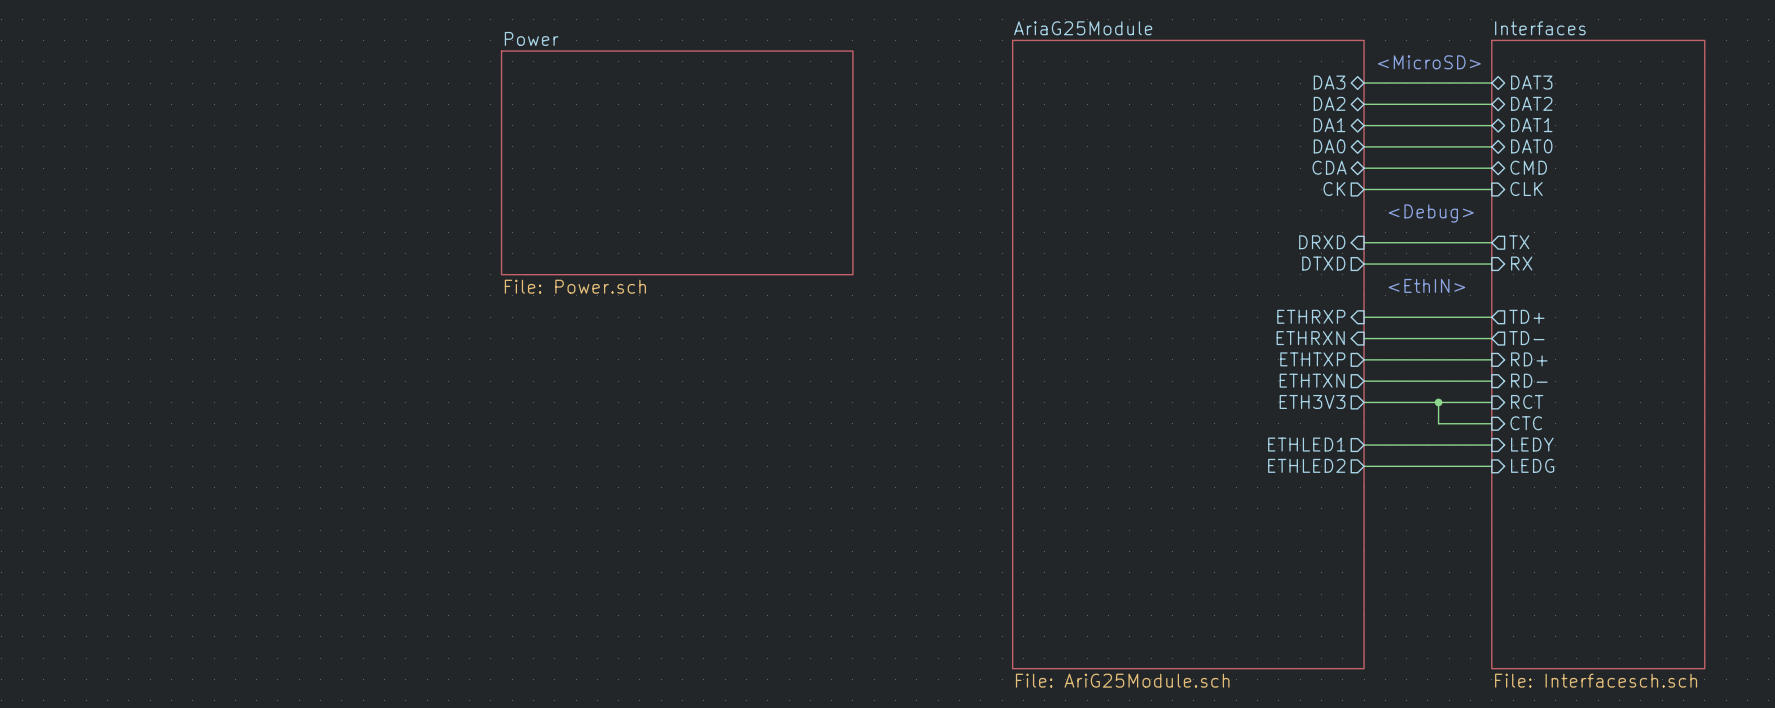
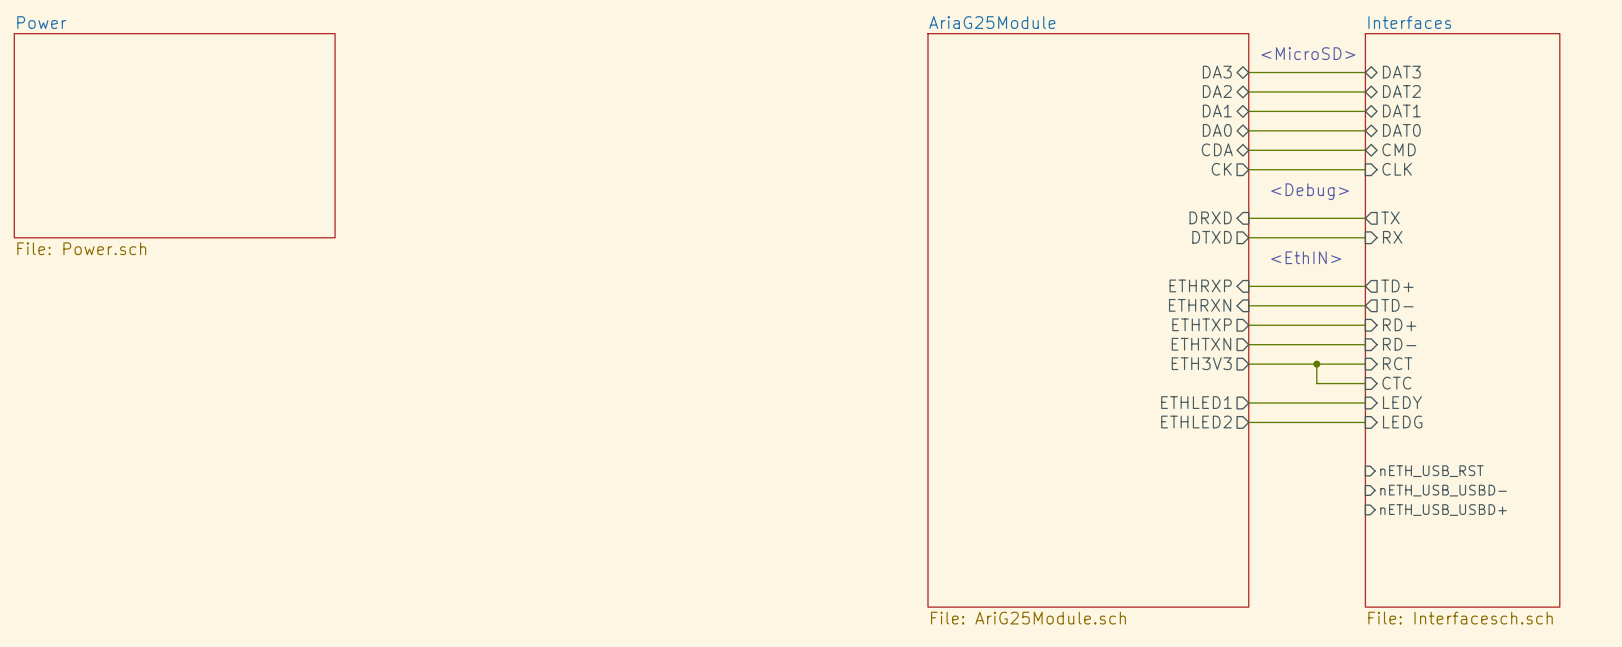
sheet Power: none -> File: Power.sch (174, 135)
sheet Power: File: Power.sch (677, 162) -> none
sheet pin: none -> nETH_USB_RST (1431, 471)
sheet pin: none -> nETH_USB_USBD- (1443, 490)
sheet pin: none -> nETH_USB_USBD+ (1443, 510)

